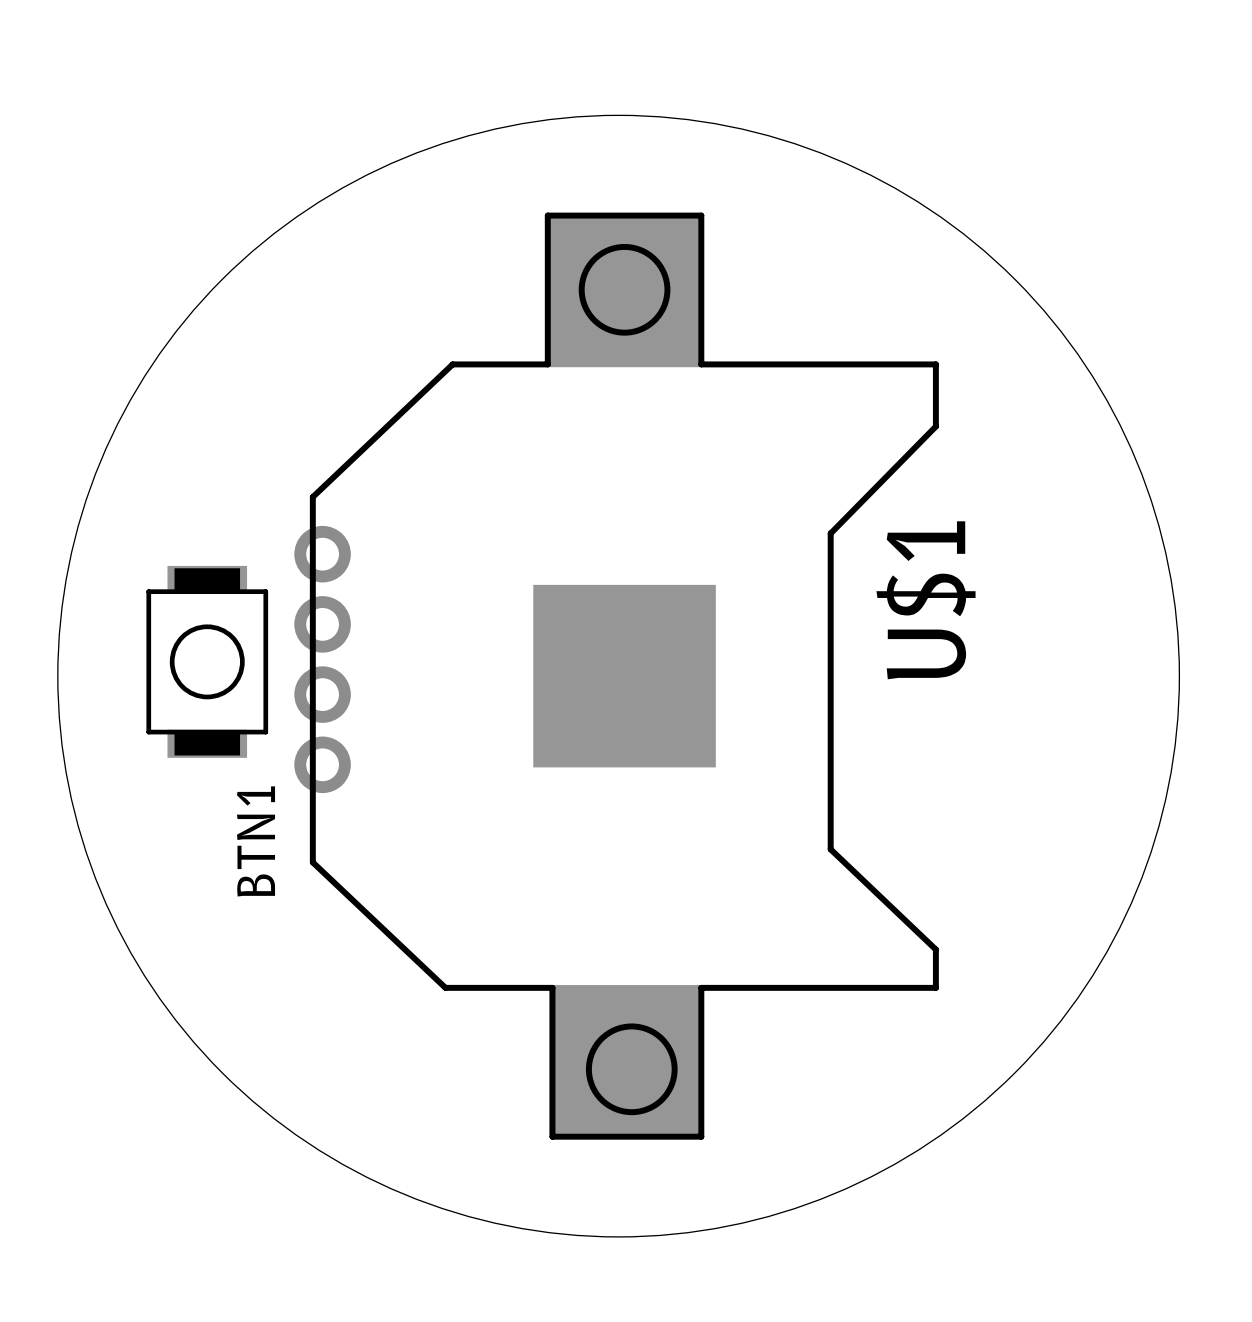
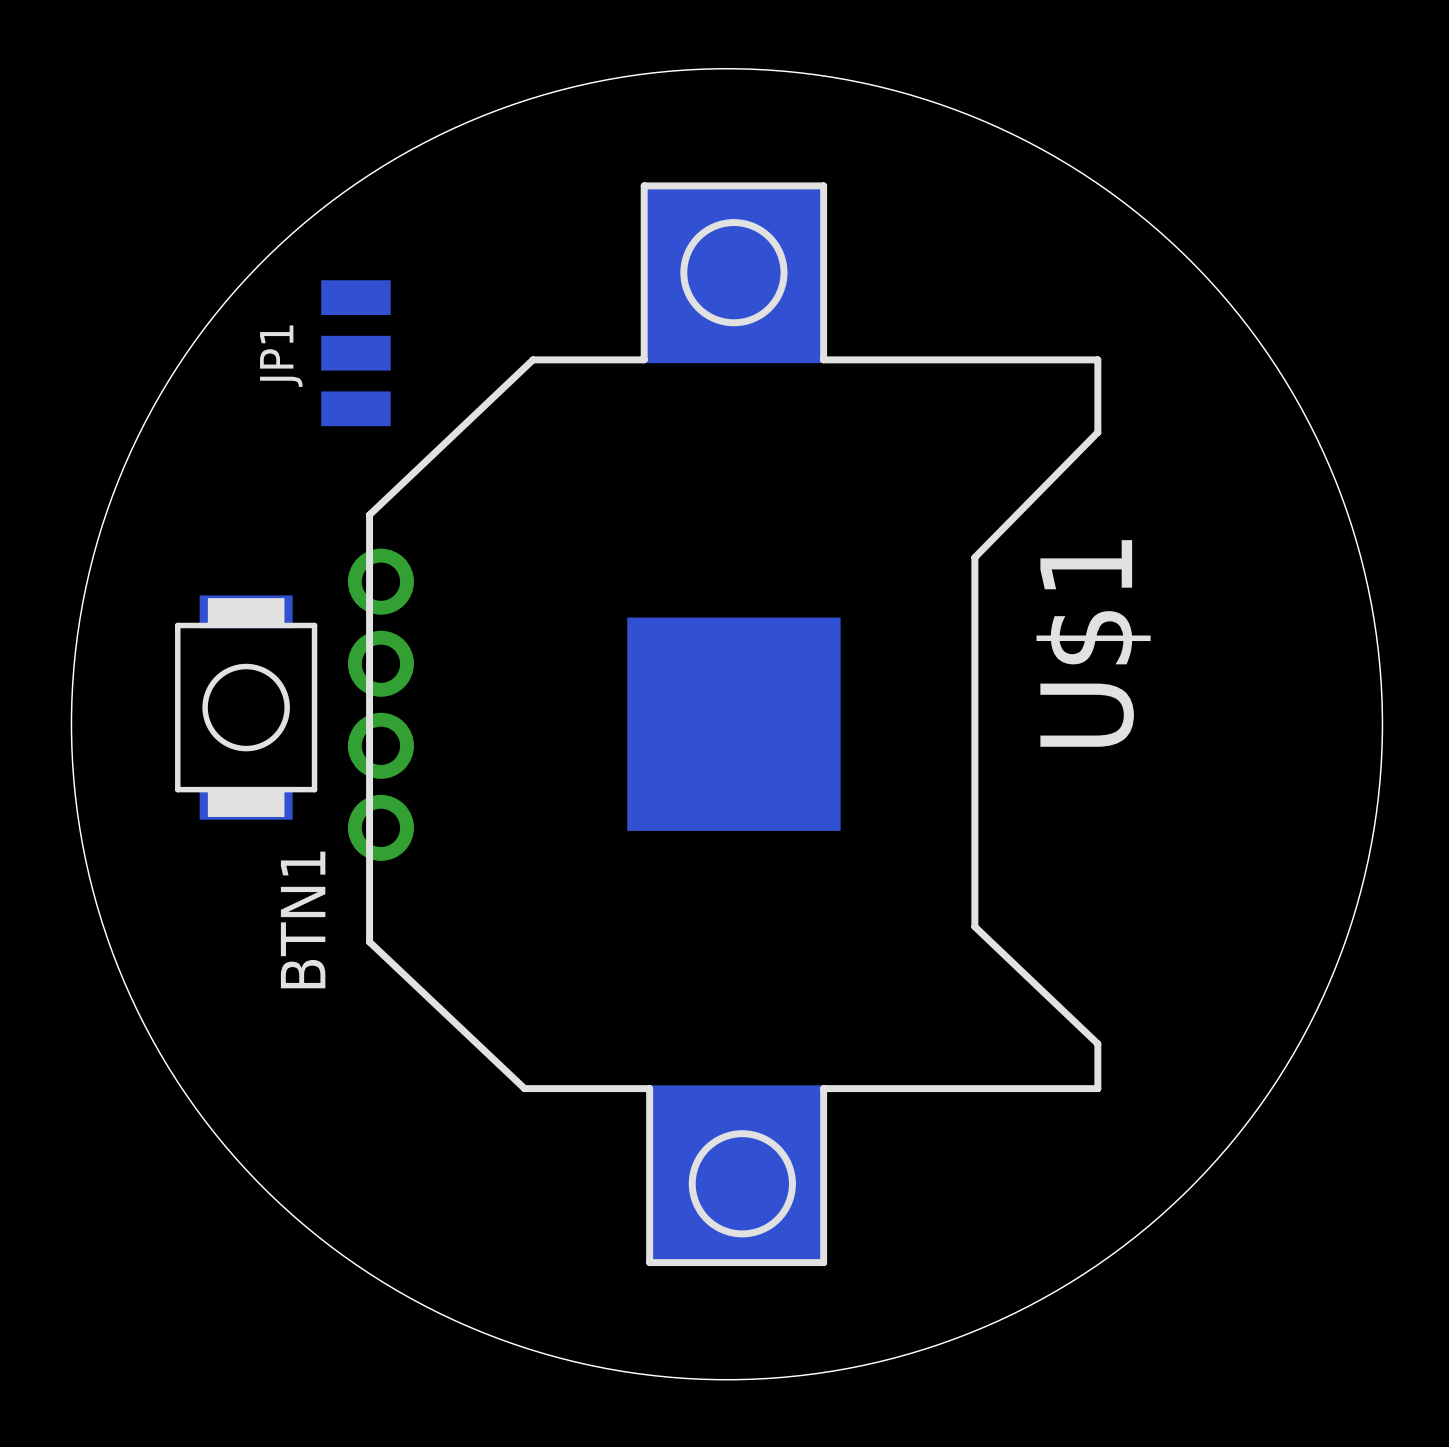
JP1: none -> (355, 353)

